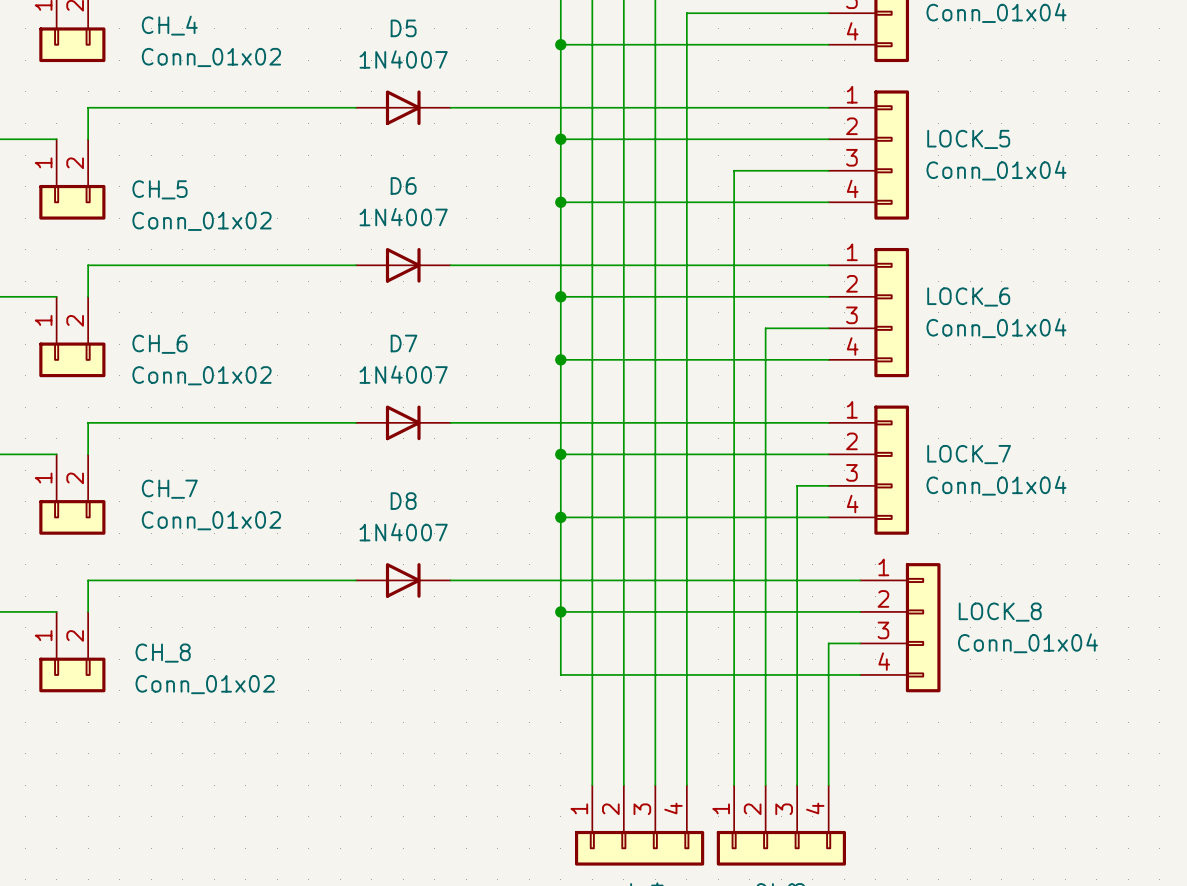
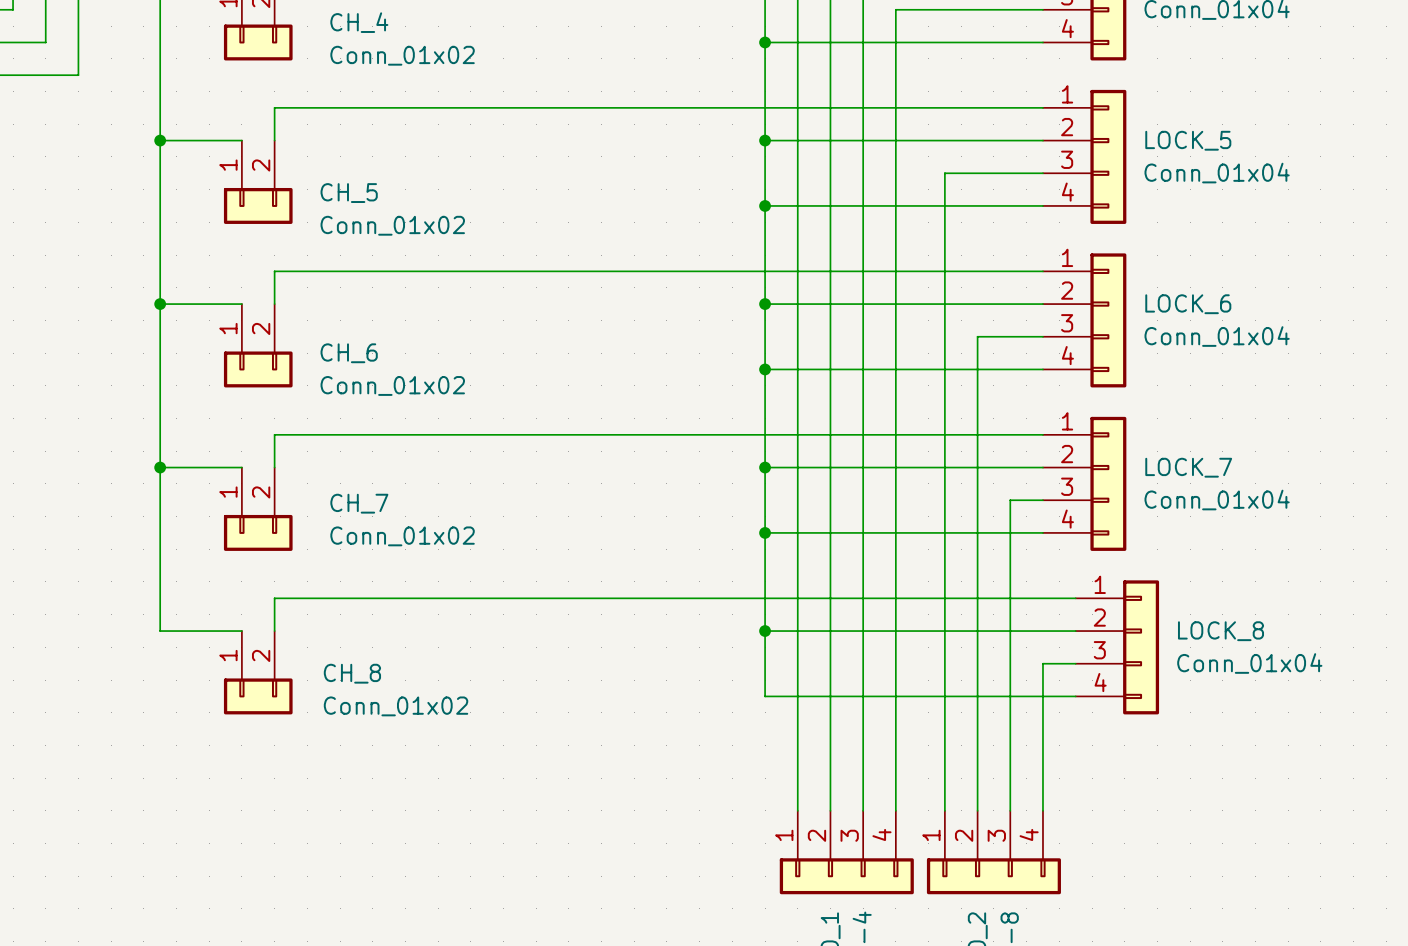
D5: 1N4007 (403, 107) -> none
D6: 1N4007 (403, 265) -> none
D7: 1N4007 (403, 422) -> none
D8: 1N4007 (403, 580) -> none

